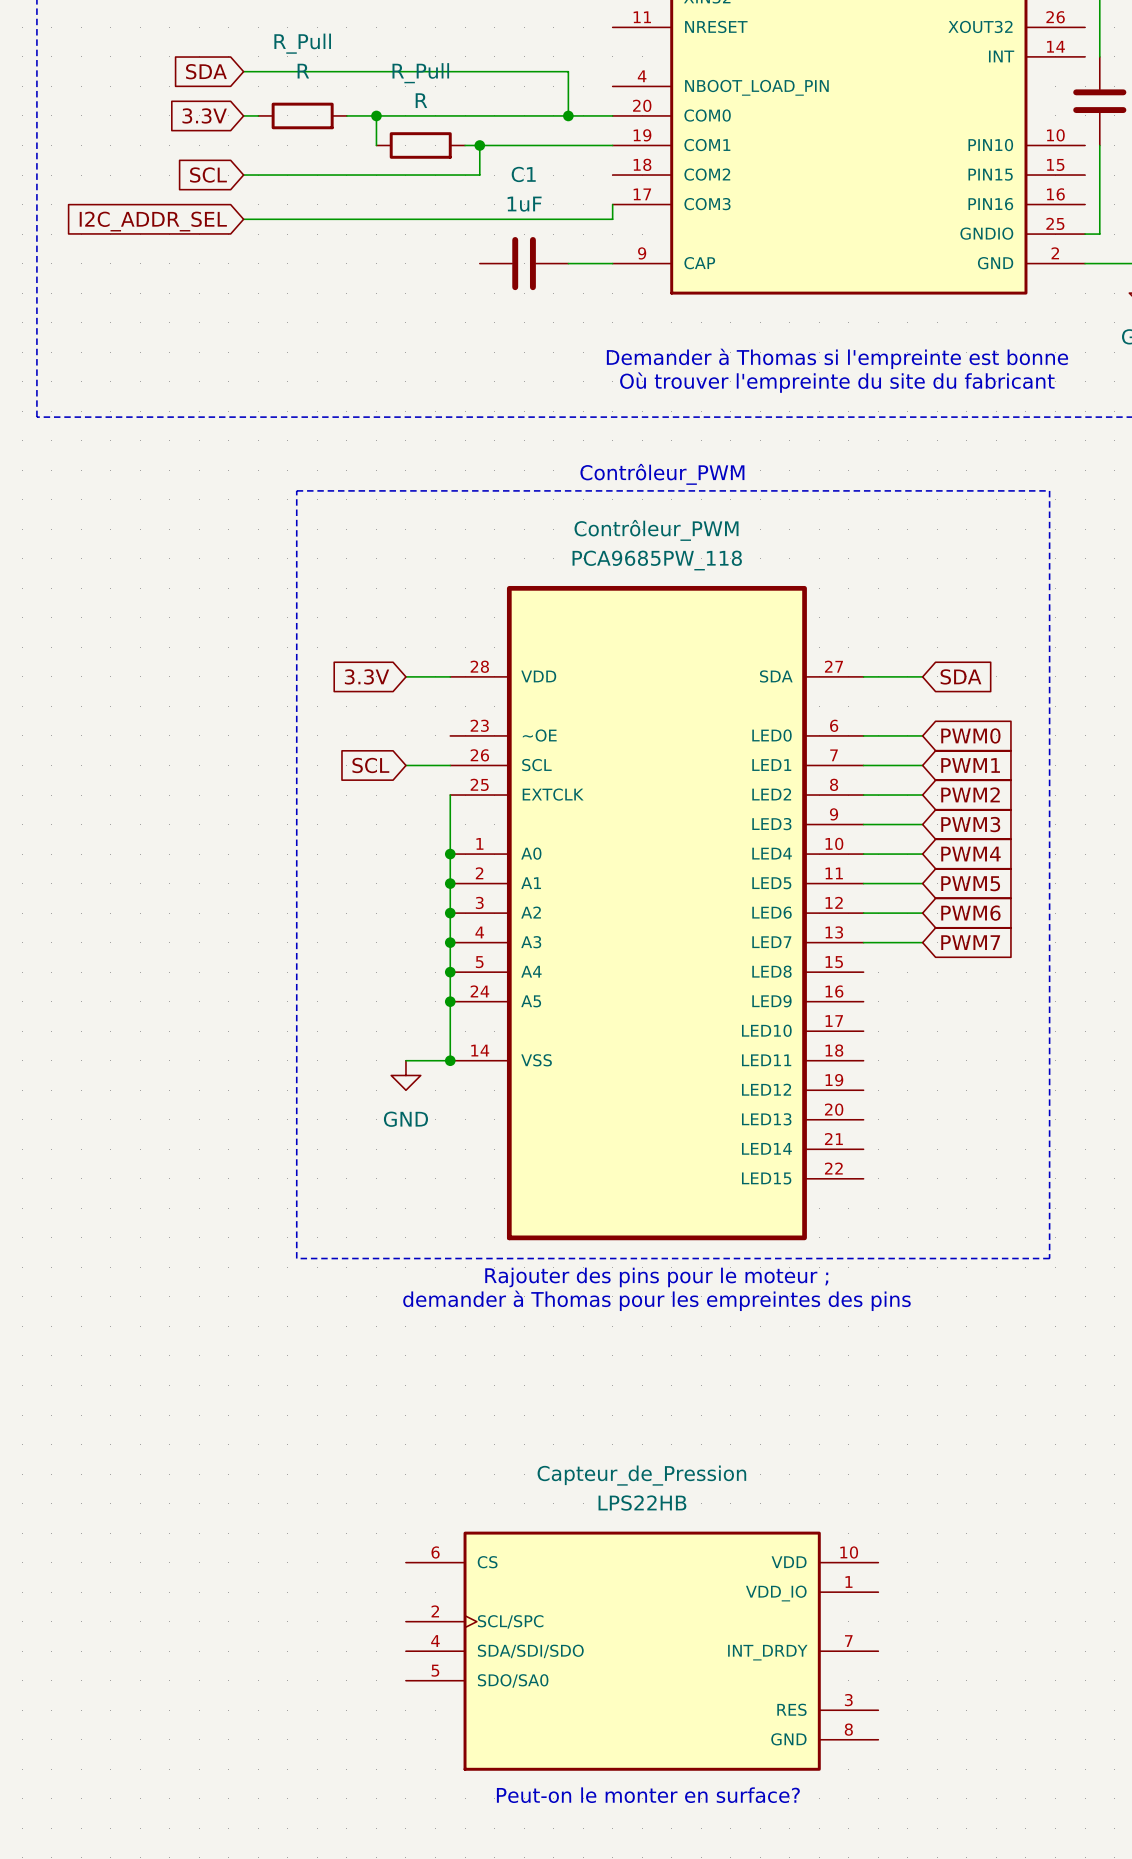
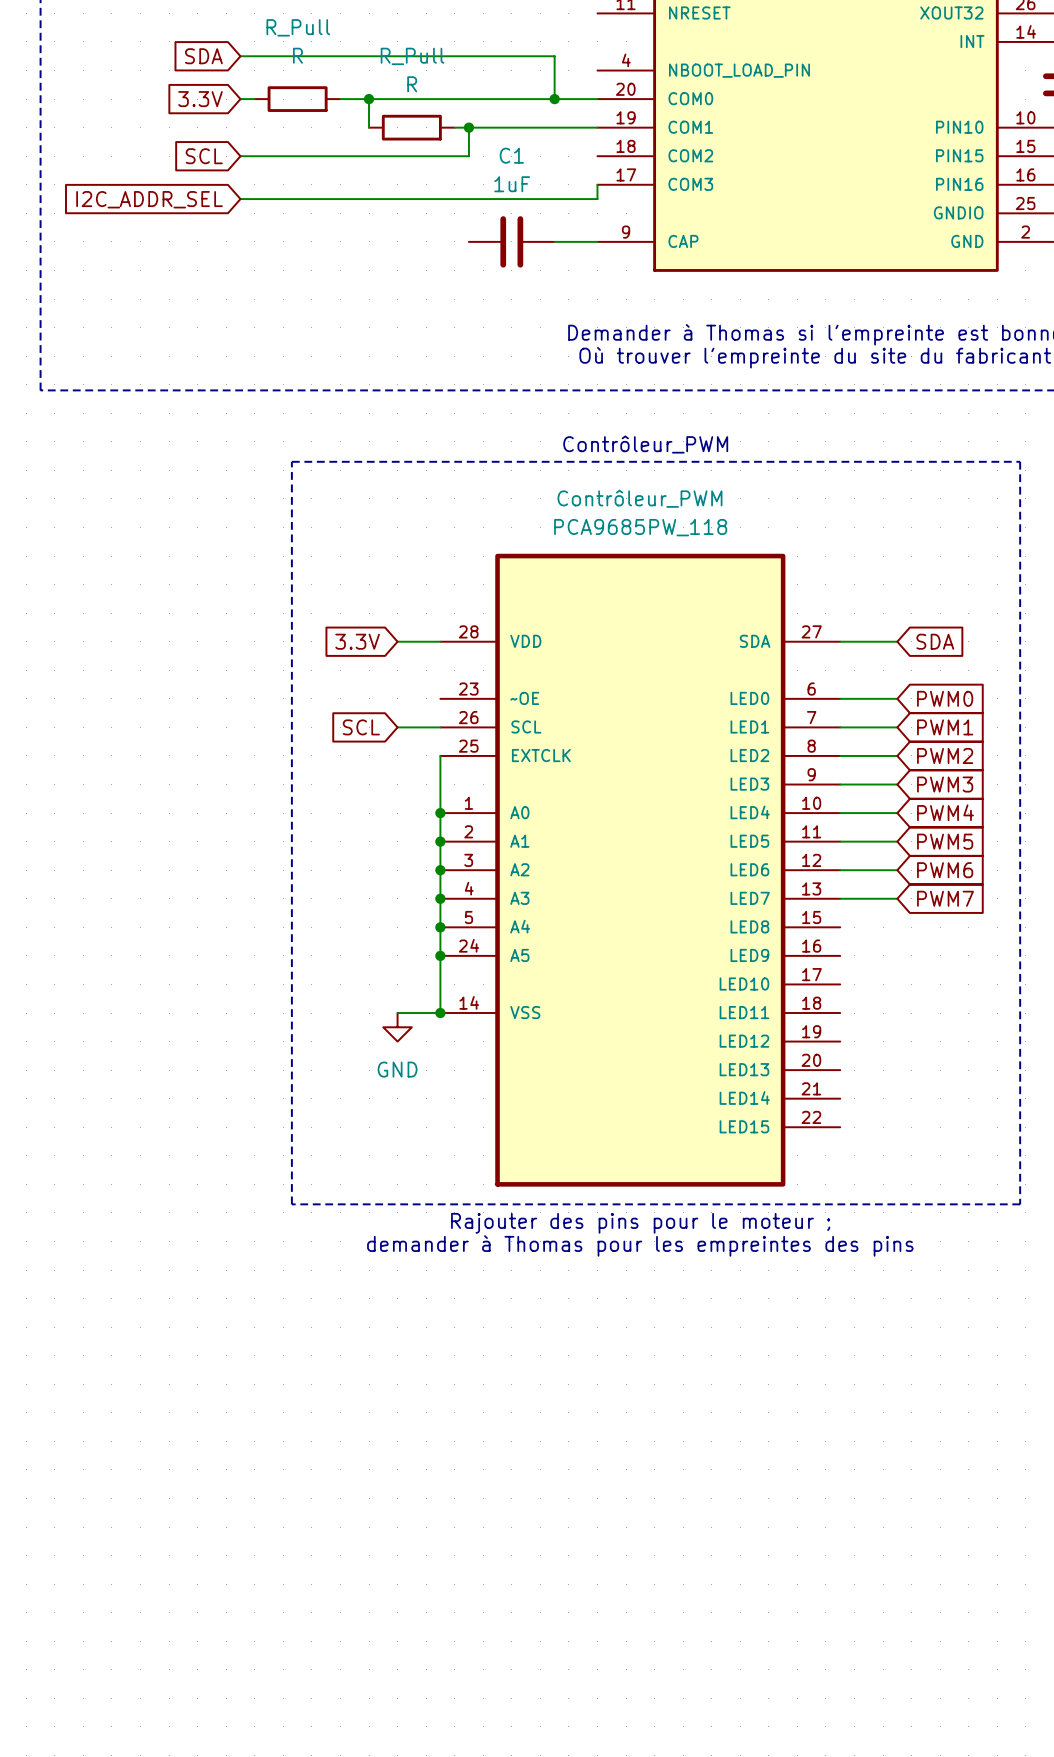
Capteur_de_Pression: LPS22HB (642, 1651) -> none
text: Peut-on le monter en surface? (648, 1795) -> none

